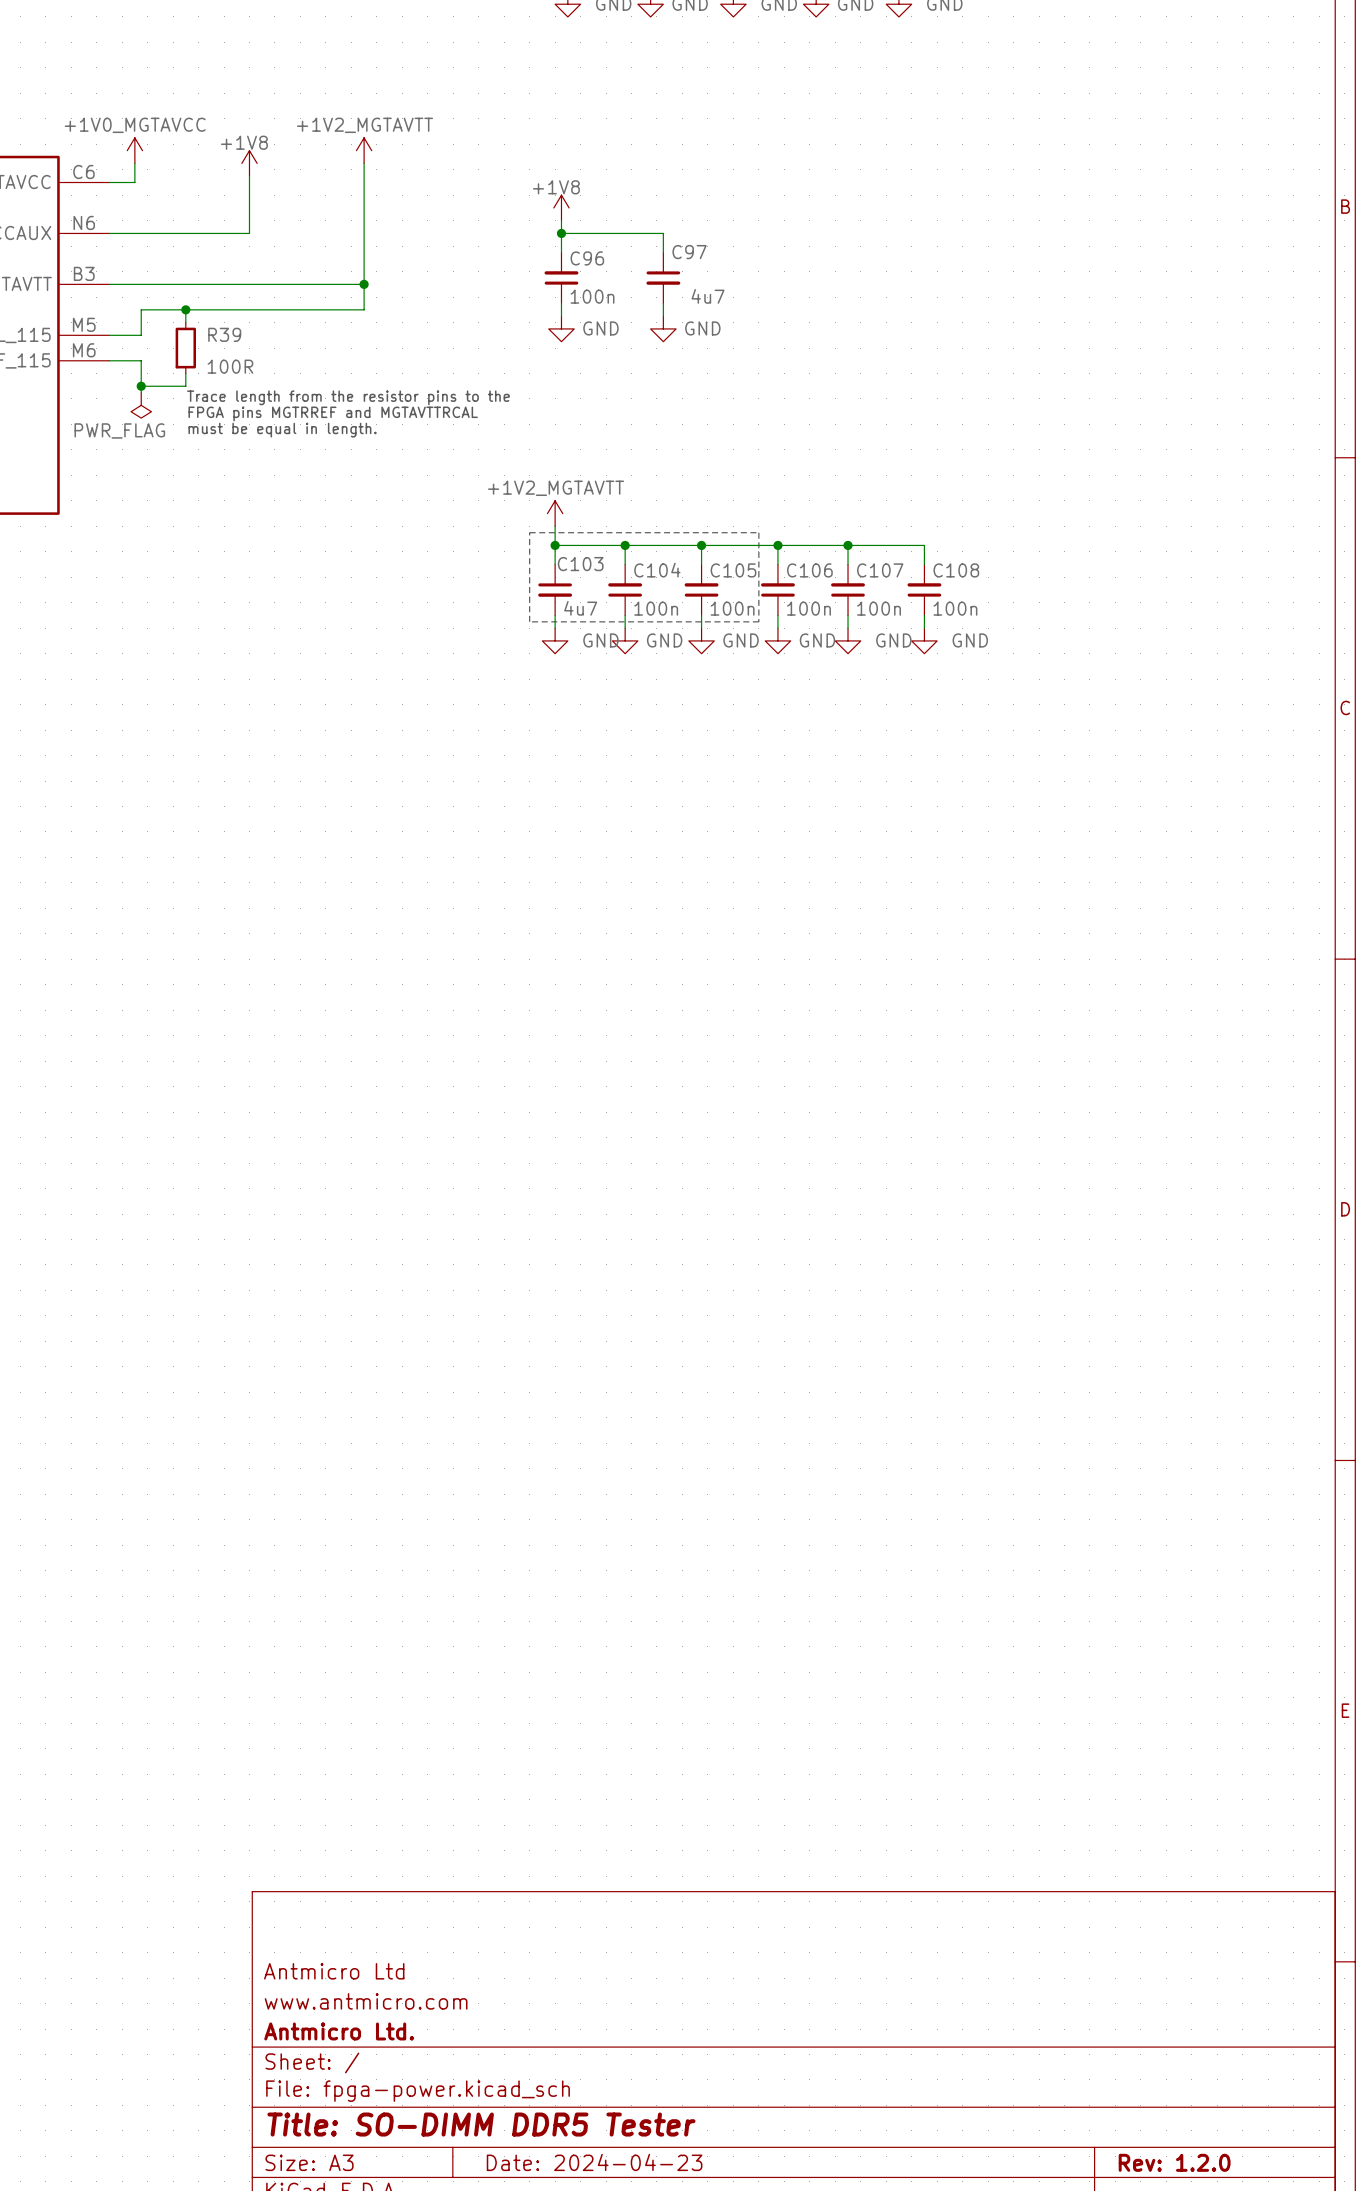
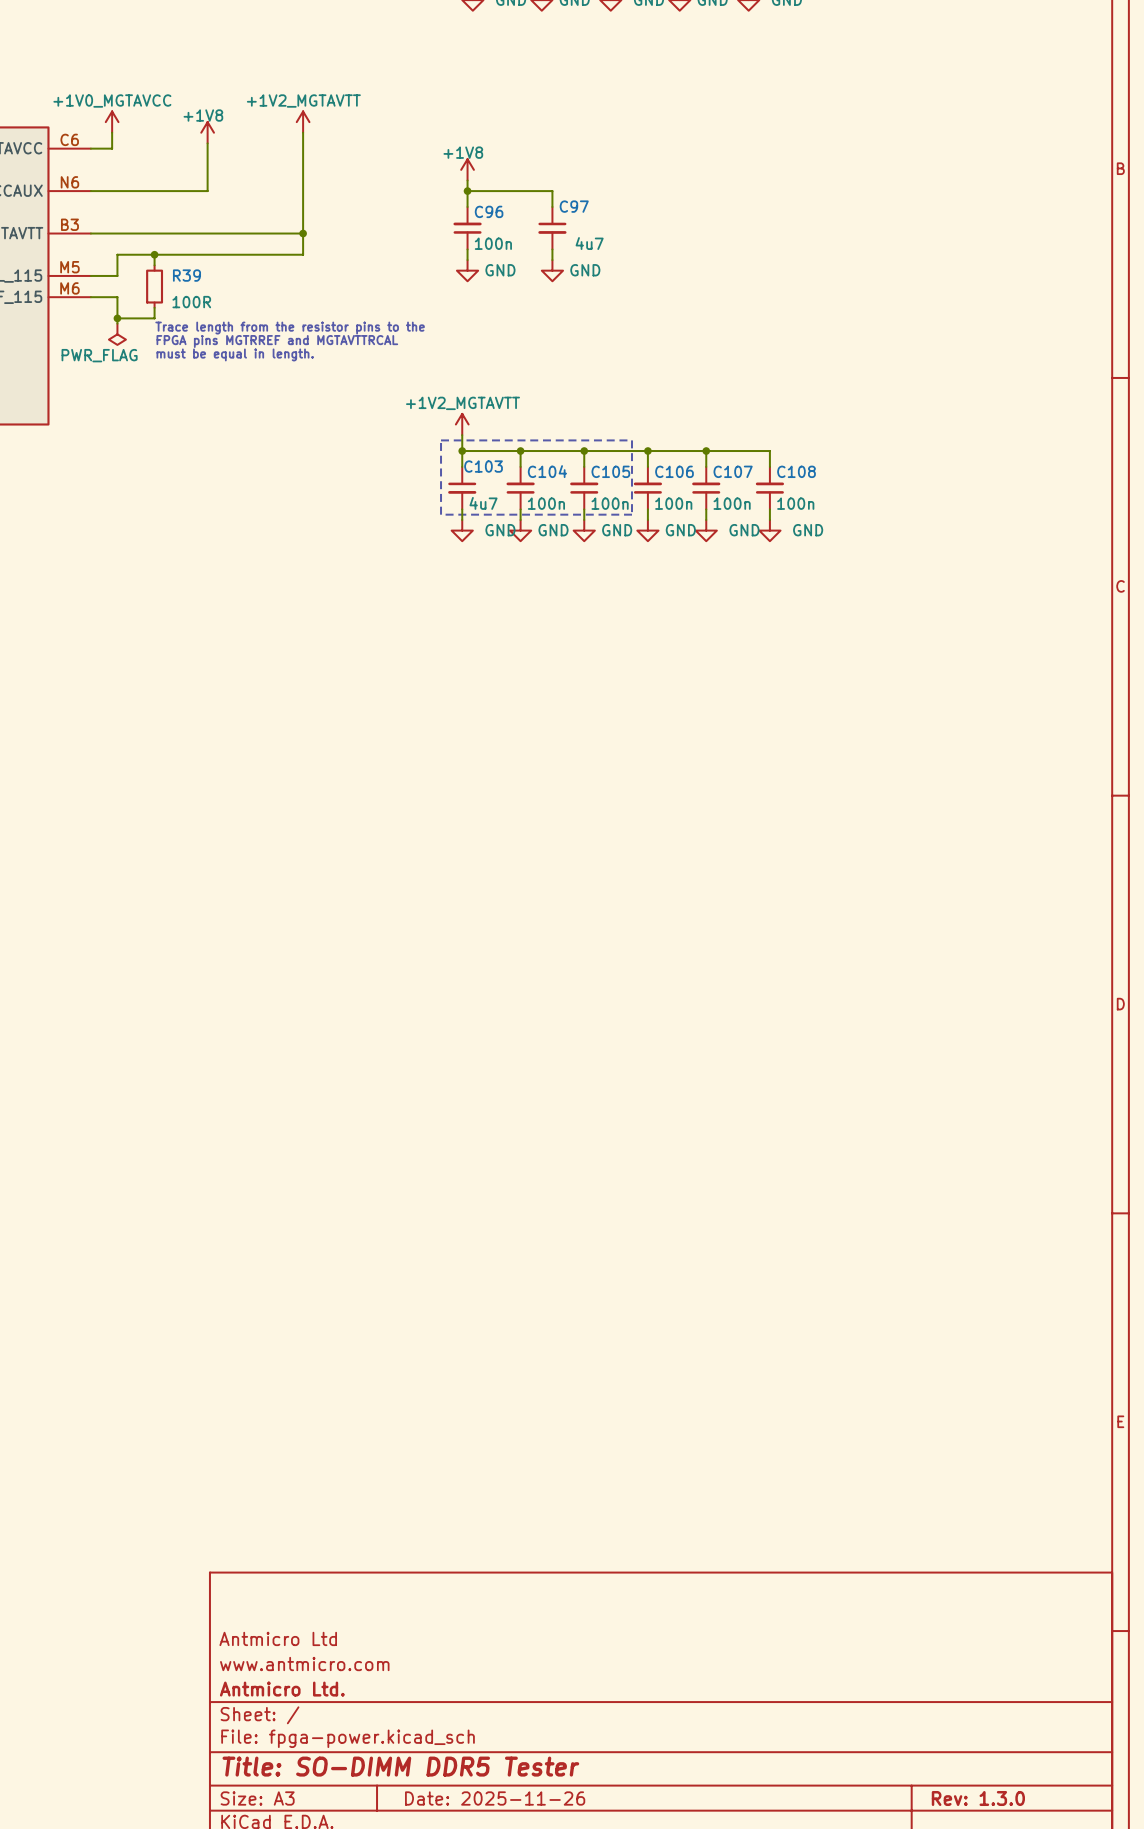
title block: Date: 2024-04-23 (594, 2162) -> Date: 2025-11-26 (495, 1798)
title block: Rev: 1.2.0 (1174, 2162) -> Rev: 1.3.0 (978, 1798)

